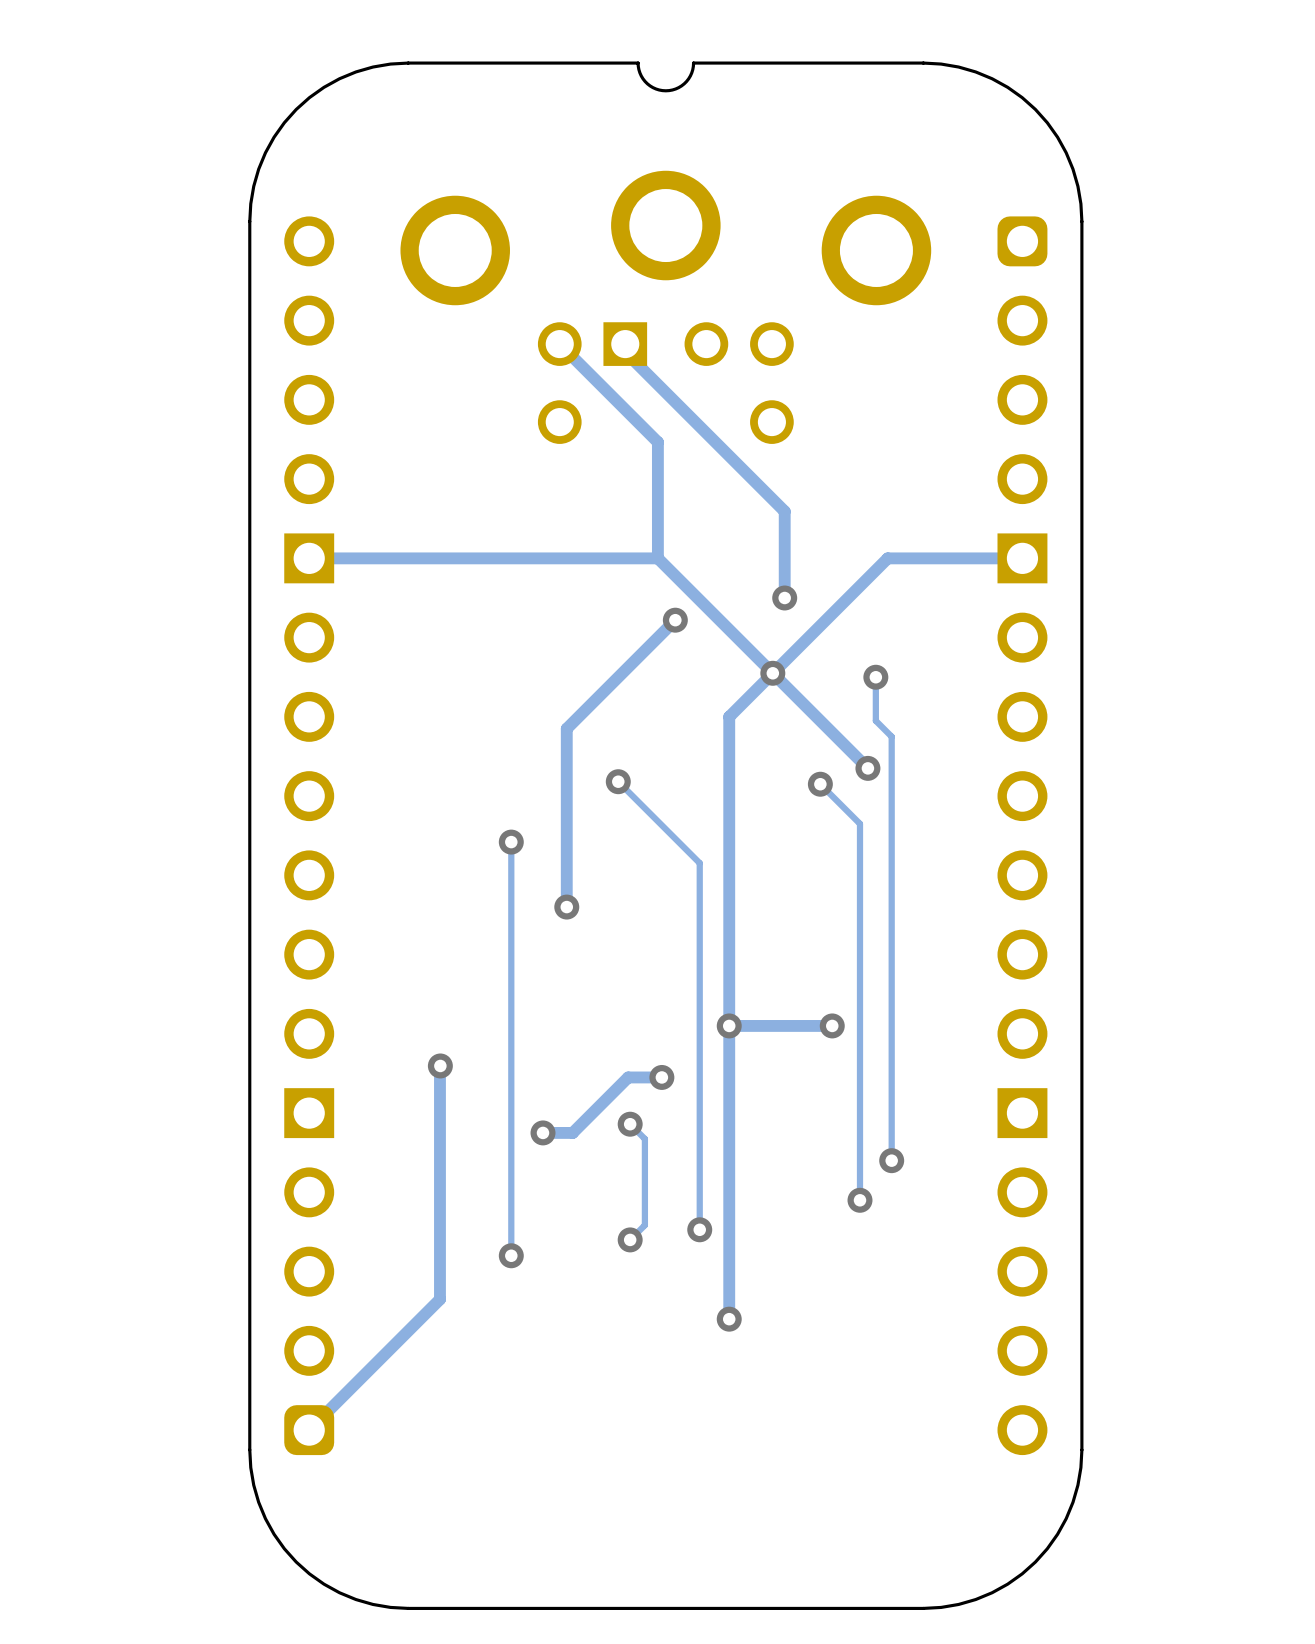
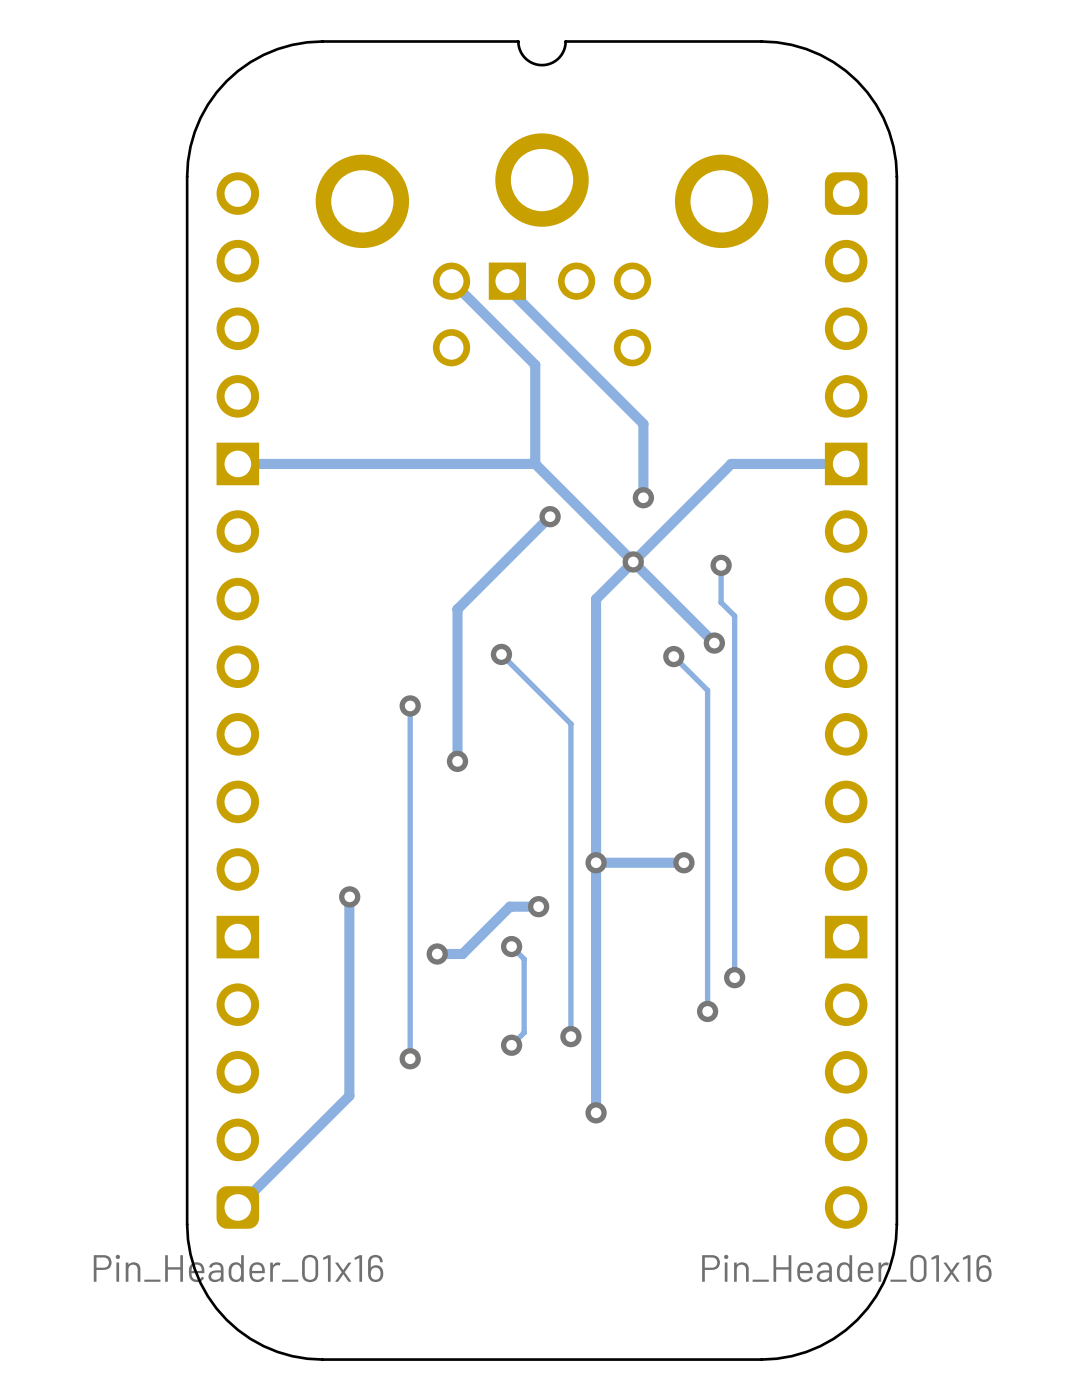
drawing: none -> [93, 1254, 384, 1283]
drawing: none -> [702, 1254, 992, 1283]

